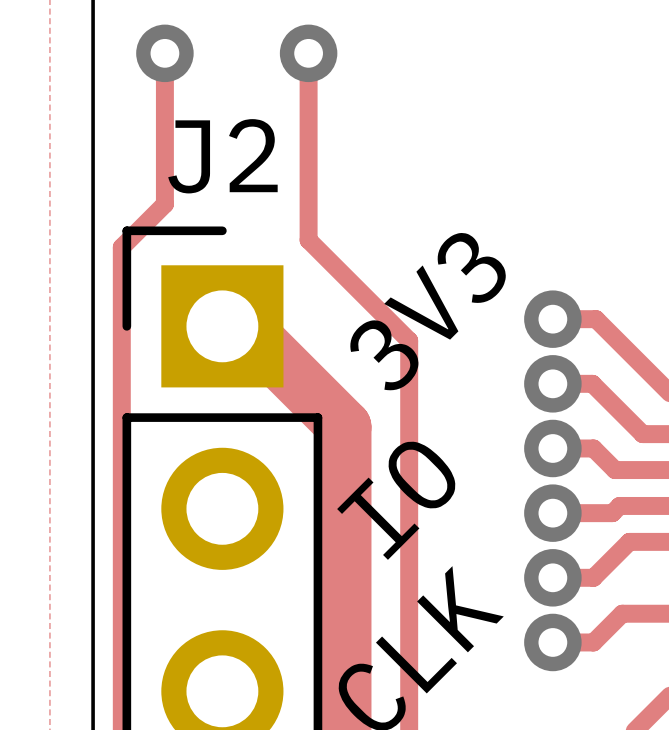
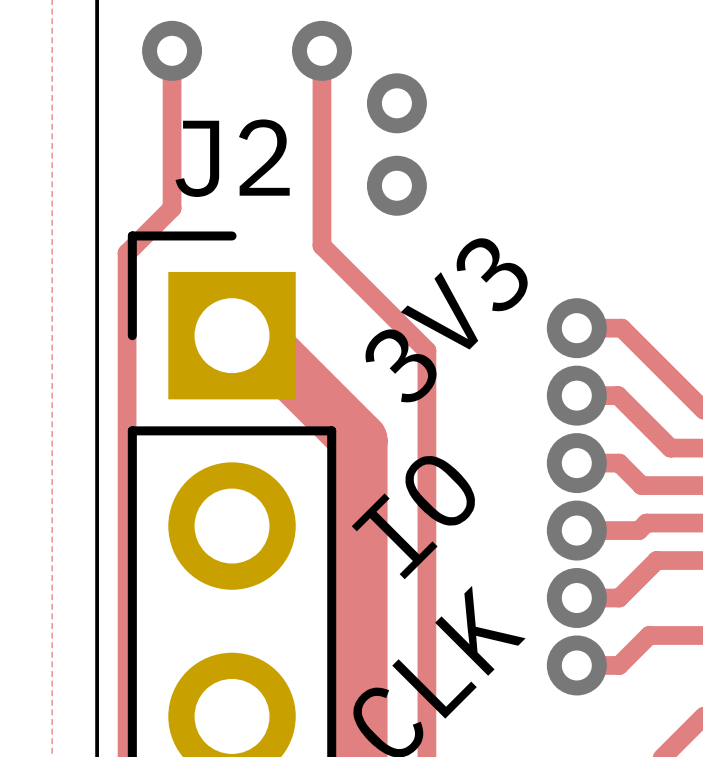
via: none -> (396, 103)
via: none -> (396, 185)

